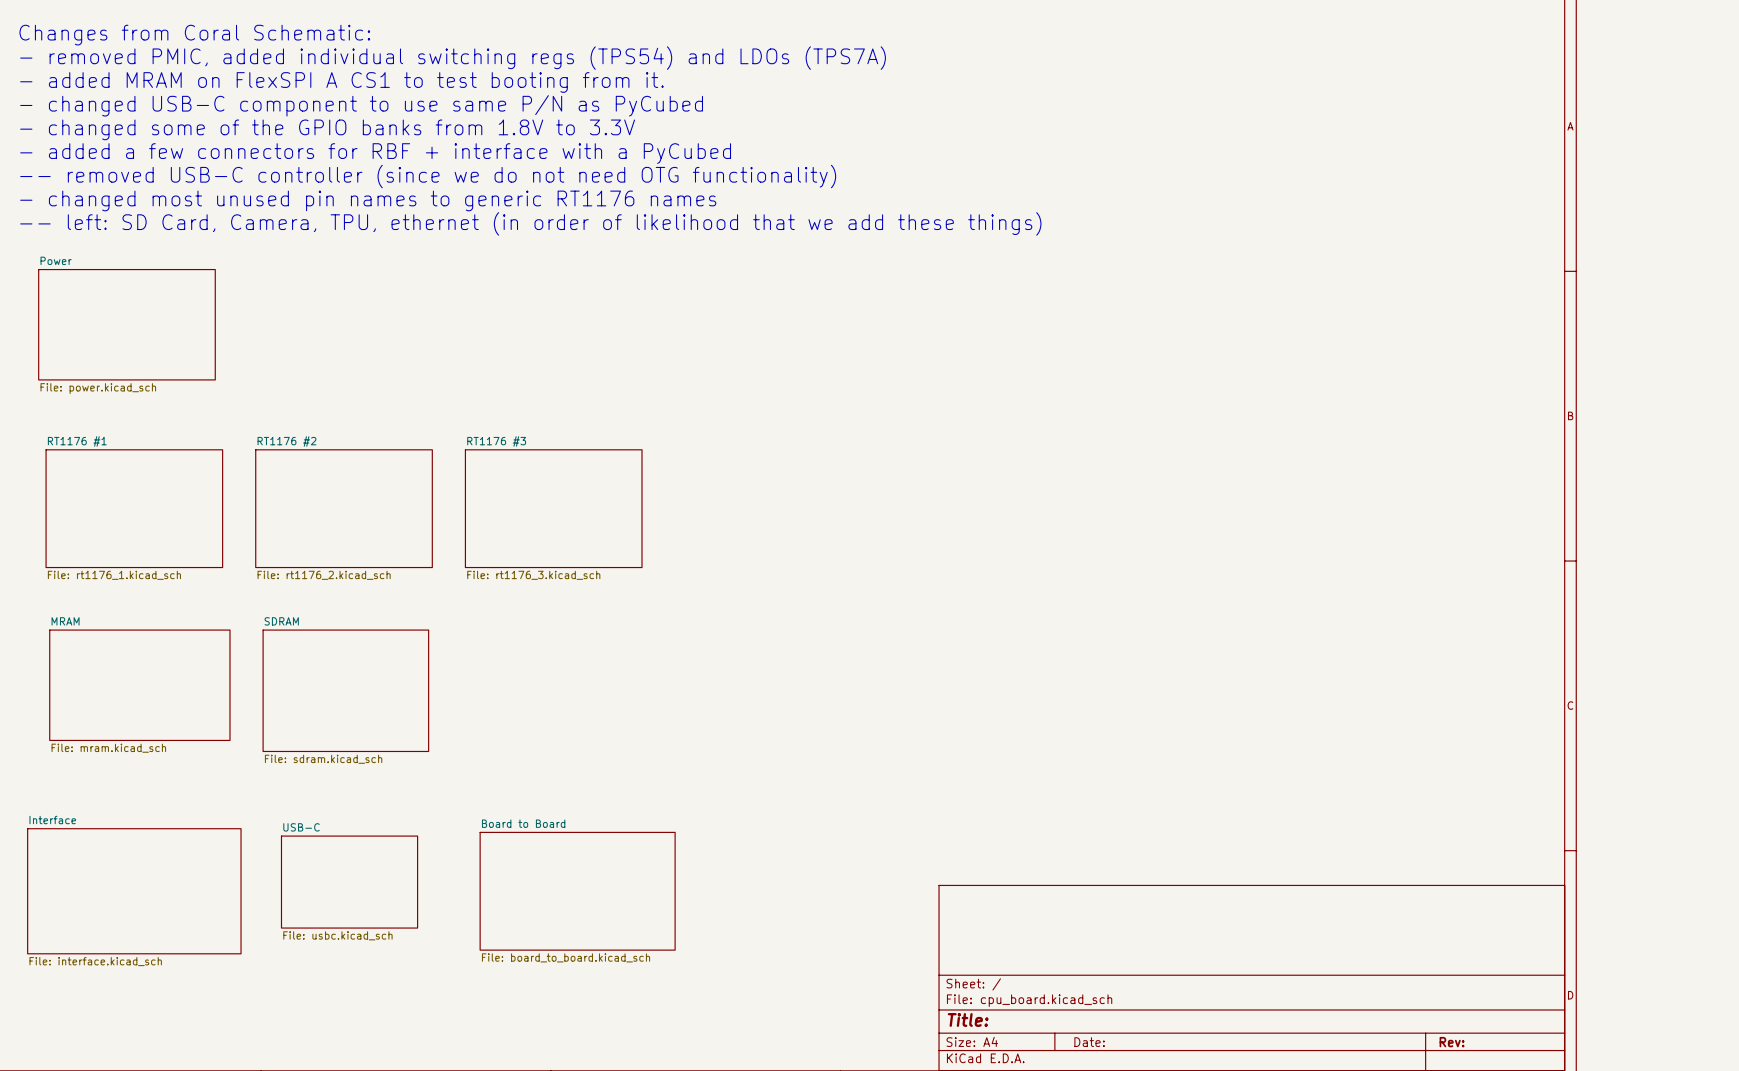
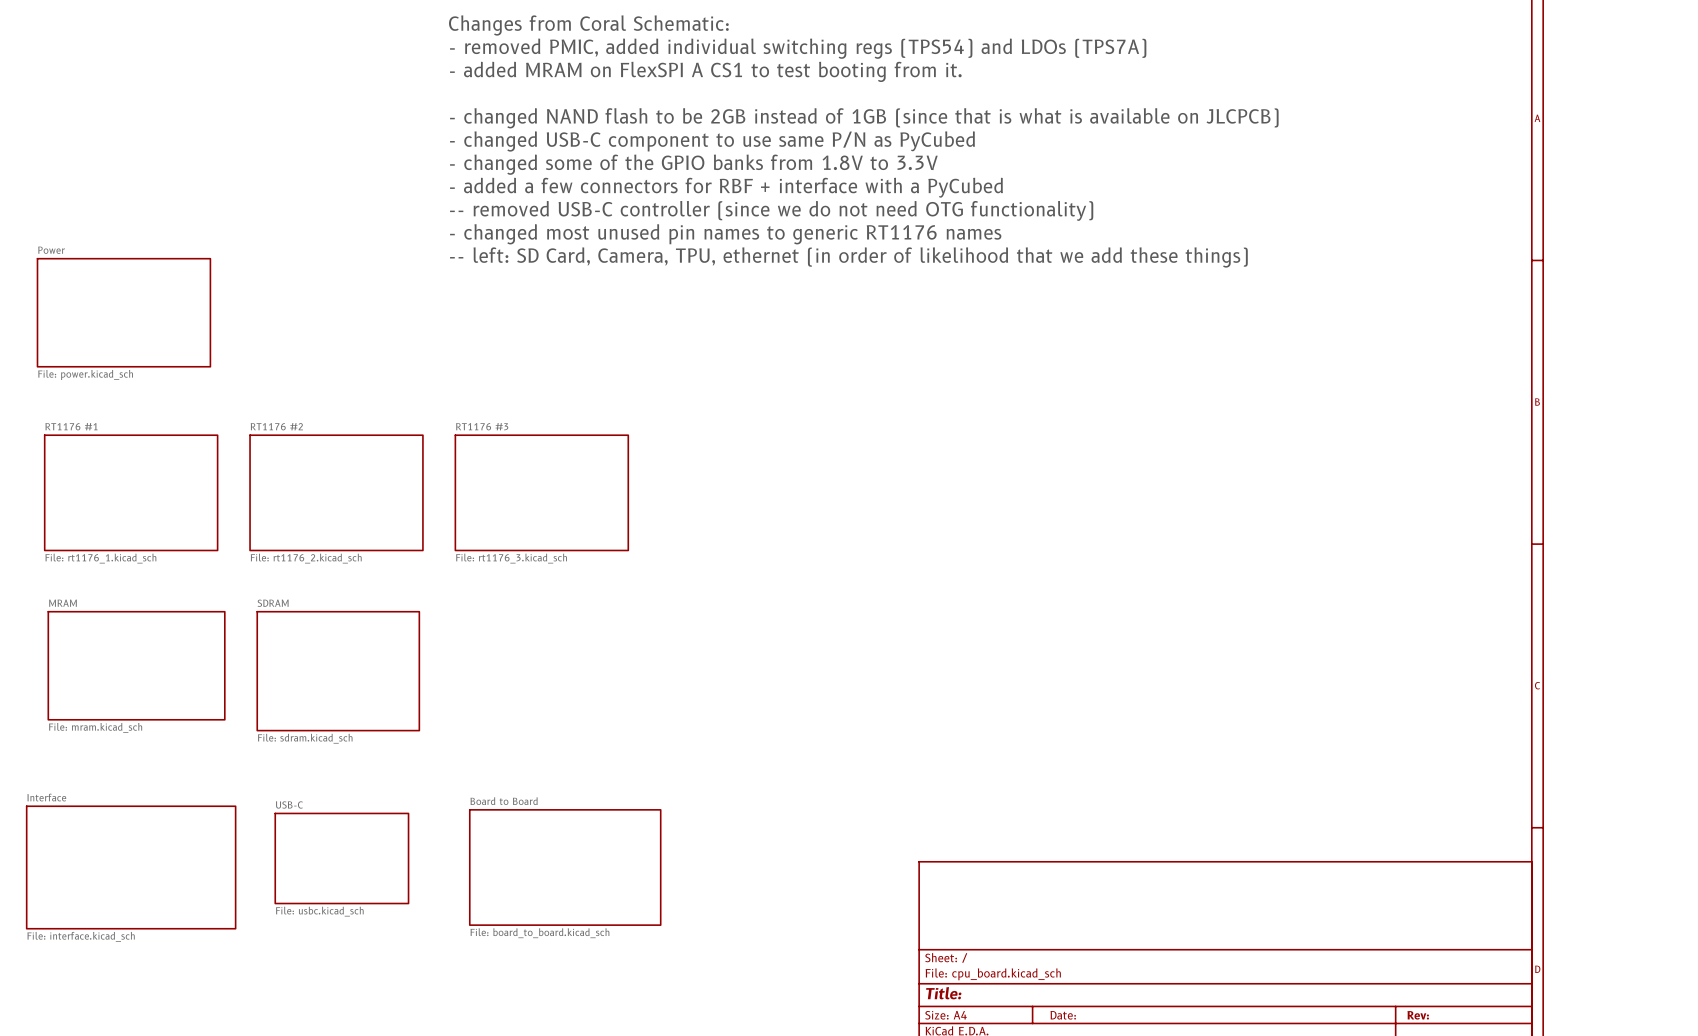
text: none -> Changes from Coral Schematic: (588, 25)
text: Changes from Coral Schematic: (194, 35) -> none
text: none -> - removed PMIC, added individual switching regs (TPS54) and LDOs (TPS7A) (798, 48)
text: - removed PMIC, added individual switching regs (TPS54) and LDOs (TPS7A) (453, 58) -> none
text: none -> - added MRAM on FlexSPI A CS1 to test booting from it. (705, 71)
text: - added MRAM on FlexSPI A CS1 to test booting from it. (341, 82) -> none
text: - changed USB-C component to use same P/N as PyCubed (361, 105) -> none
text: none -> - changed NAND flash to be 2GB instead of 1GB (since that is what is available on JLCPCB) (864, 118)
text: - changed some of the GPIO banks from 1.8V to 3.3V (327, 129) -> none
text: none -> - changed USB-C component to use same P/N as PyCubed (712, 141)
text: - added a few connectors for RBF + interface with a PyCubed (375, 153) -> none
text: none -> - changed some of the GPIO banks from 1.8V to 3.3V (693, 164)
text: -- removed USB-C controller (since we do not need OTG functionality) (428, 176) -> none
text: none -> - added a few connectors for RBF + interface with a PyCubed (726, 187)
text: - changed most unused pin names to generic RT1176 names (368, 200) -> none
text: none -> -- removed USB-C controller (since we do not need OTG functionality) (771, 210)
text: -- left: SD Card, Camera, TPU, ethernet (in order of likelihood that we add these things) (530, 223) -> none
text: none -> - changed most unused pin names to generic RT1176 names (725, 234)
text: none -> -- left: SD Card, Camera, TPU, ethernet (in order of likelihood that we add these things) (848, 257)

